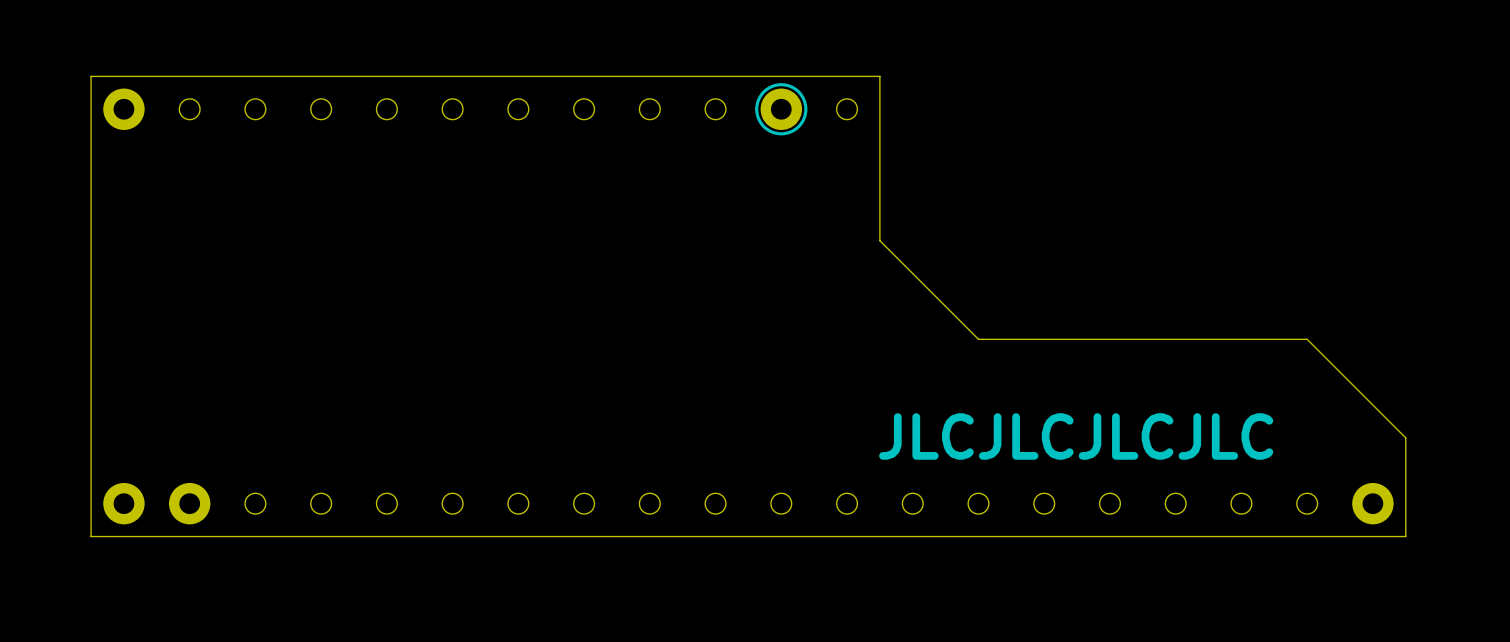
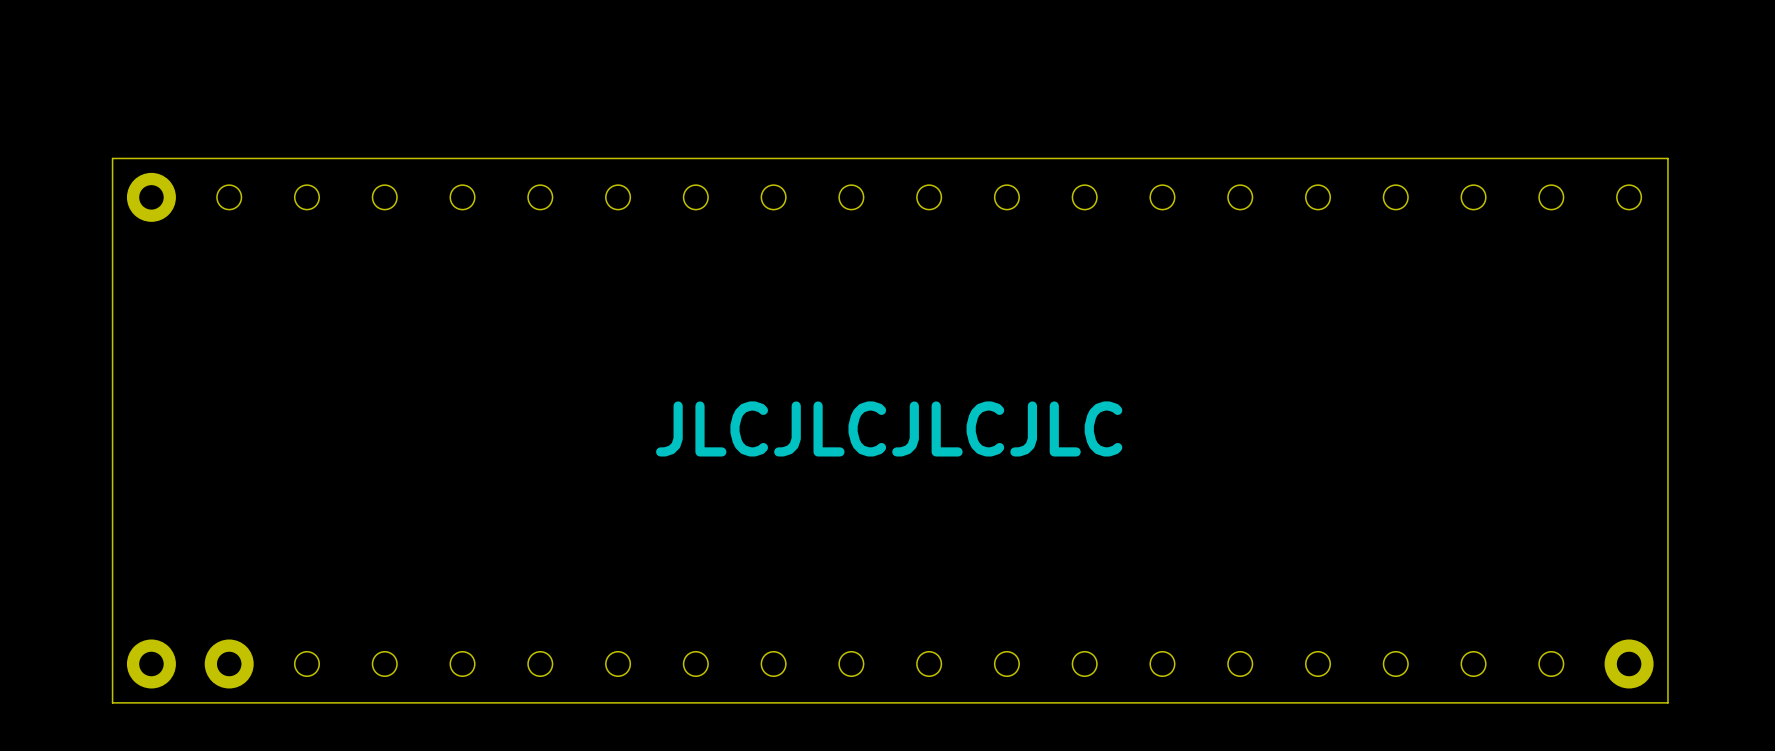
board edge: (879, 76) (879, 240) (978, 339) (1307, 339) (1405, 437) -> (1045, 158) (1667, 158) (1667, 586)
round board edge: none -> [916, 184, 943, 211]
round board edge: none -> [1071, 184, 1098, 211]
round board edge: none -> [1149, 184, 1176, 211]
round board edge: none -> [1227, 184, 1254, 211]
round board edge: none -> [1304, 184, 1332, 211]
round board edge: none -> [1382, 184, 1409, 211]
round board edge: none -> [1460, 184, 1487, 211]
round board edge: none -> [1538, 184, 1565, 211]
round board edge: none -> [1616, 184, 1643, 211]
part: (781, 109) -> none
text position: JLCJLCJLCJLC (1076, 436) -> JLCJLCJLCJLC (889, 428)

